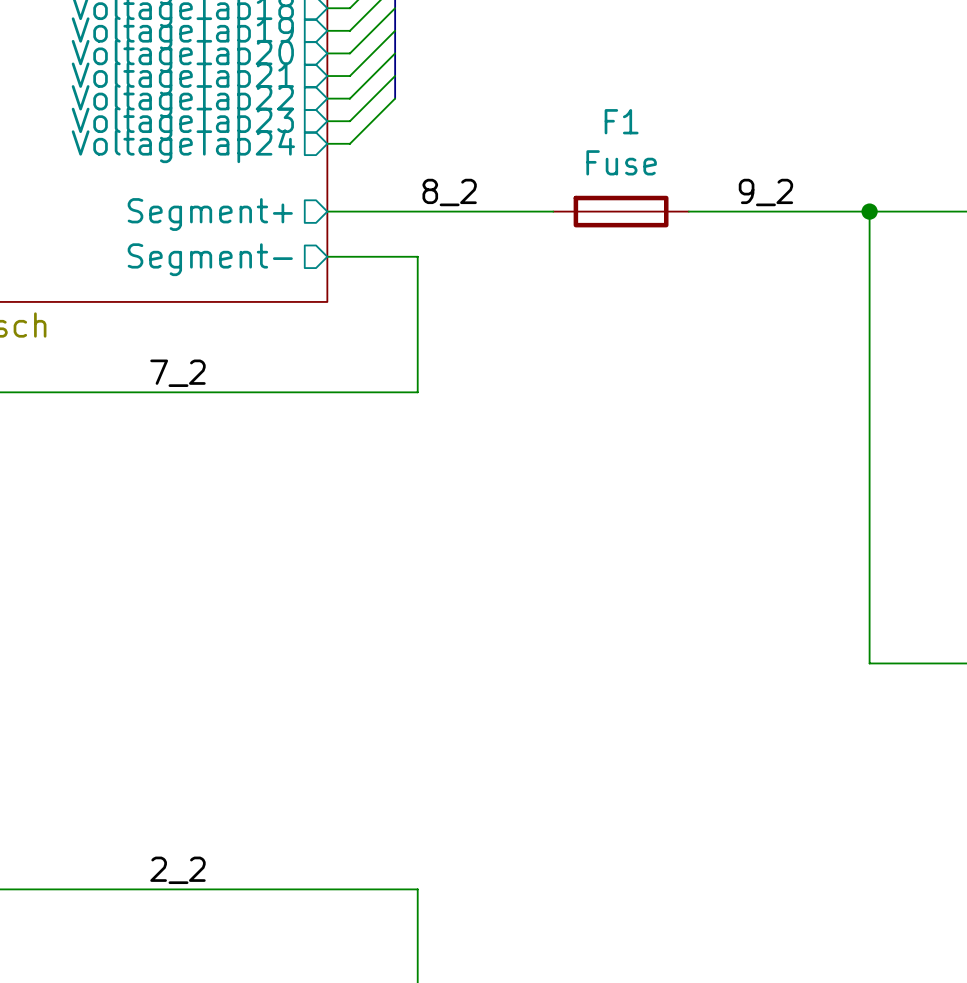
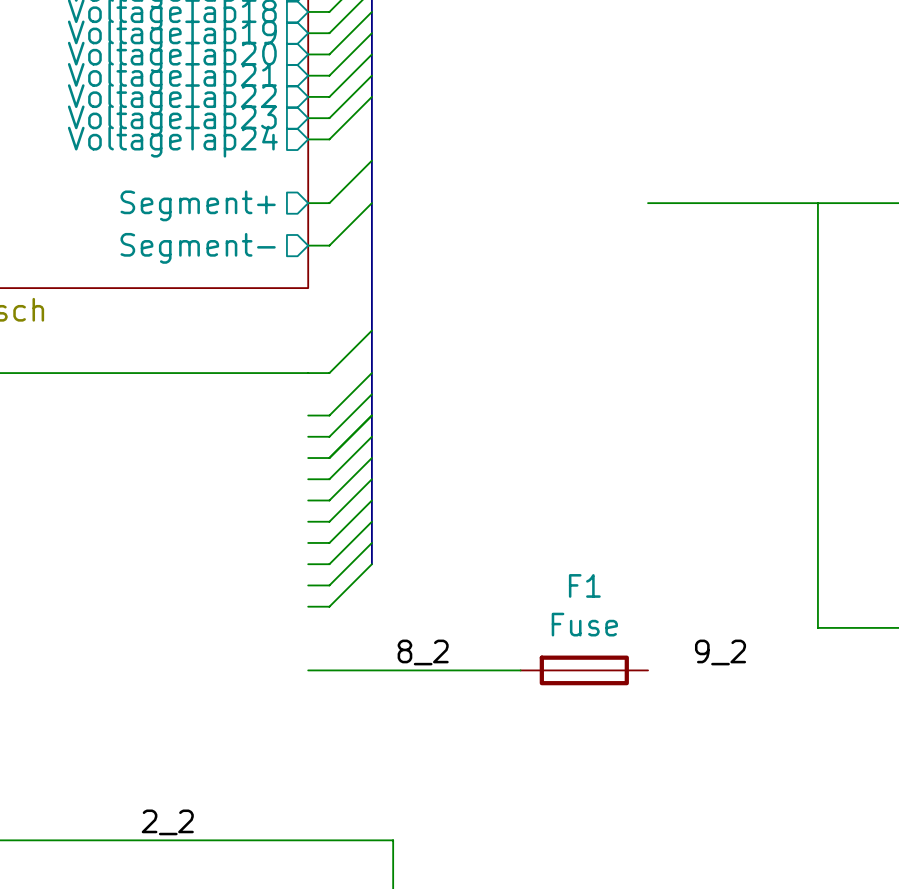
bus: none -> (371, 96) (371, 564)
label: 8_2 (449, 192) -> none
label: 9_2 (765, 192) -> none
wire: (349, 211) (553, 211) -> (329, 203) (371, 160)
wire: none -> (371, 203) (329, 245)
F1 position: (621, 211) -> (584, 670)
junction: (869, 211) -> none
wire: (349, 256) (417, 256) (417, 392) (349, 392) -> (371, 330) (329, 373)
label: 7_2 (177, 373) -> none
wire: none -> (371, 373) (329, 415) (308, 415)
wire: none -> (371, 394) (329, 436) (308, 436)
wire: none -> (371, 415) (329, 458) (308, 458)
wire: none -> (371, 436) (329, 479) (308, 479)
wire: none -> (371, 458) (329, 500) (308, 500)
wire: none -> (371, 479) (329, 521) (308, 521)
wire: none -> (371, 500) (329, 542) (308, 542)
wire: none -> (371, 521) (329, 564) (308, 564)
wire: none -> (371, 542) (329, 585) (308, 585)
wire: none -> (371, 564) (329, 606) (308, 606)
label: none -> 8_2 (423, 652)
label: none -> 9_2 (720, 652)
wire: none -> (308, 670) (520, 670)

